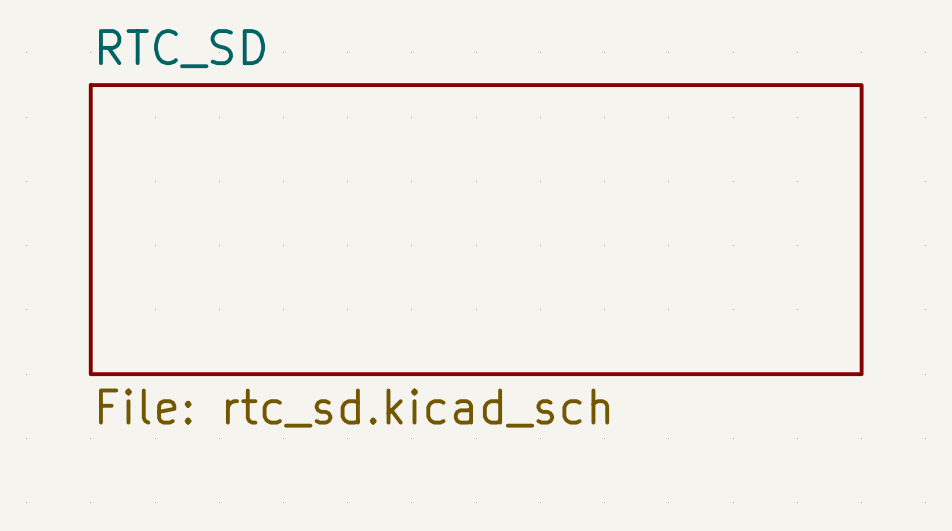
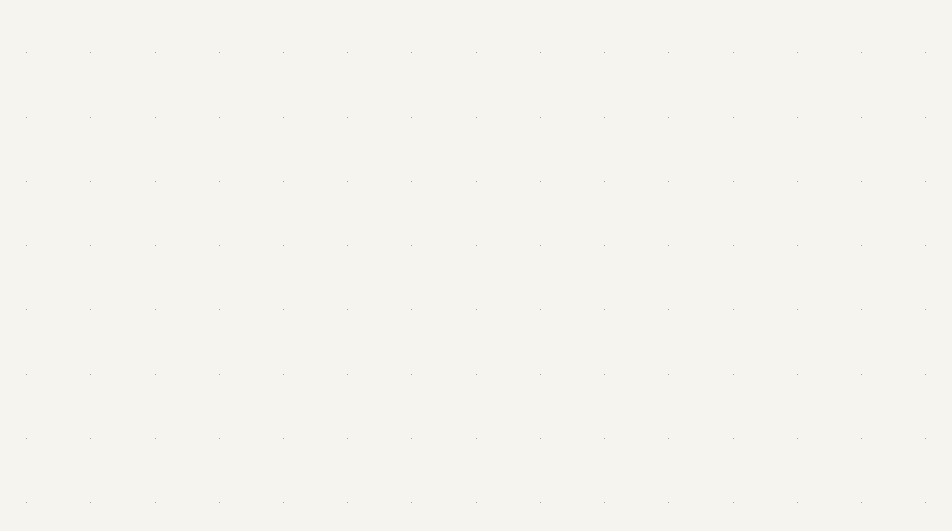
sheet RTC_SD: File: rtc_sd.kicad_sch (476, 229) -> none

